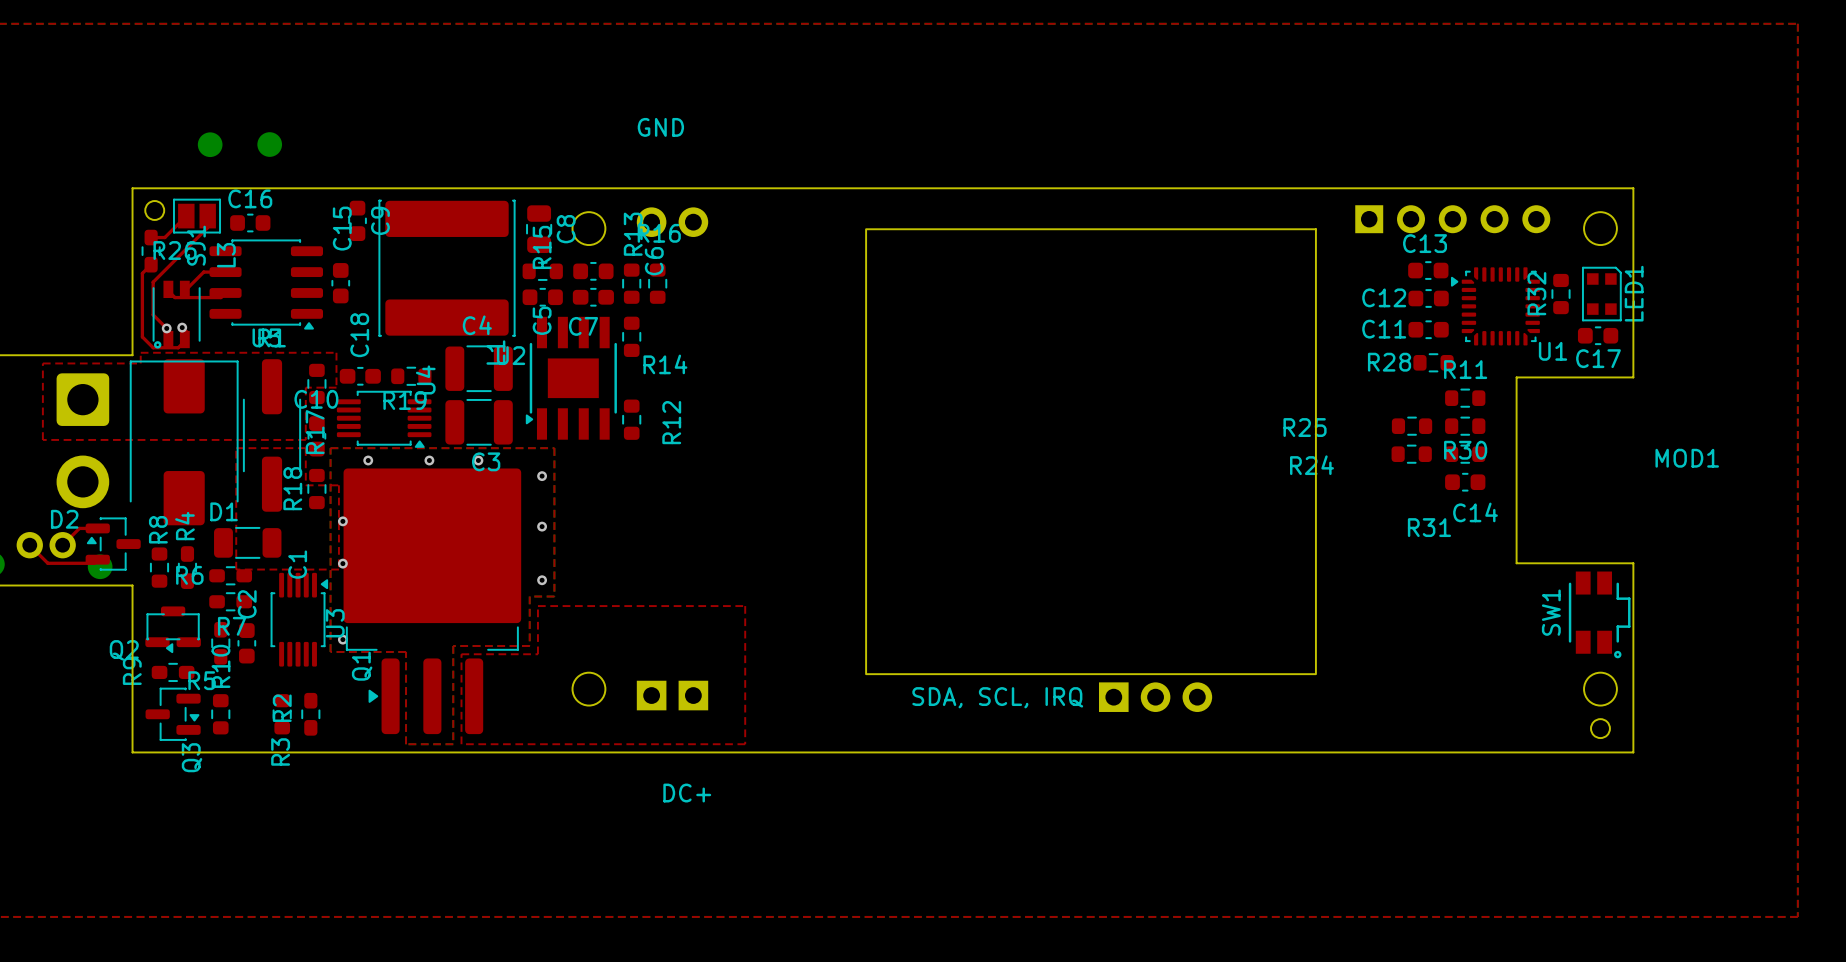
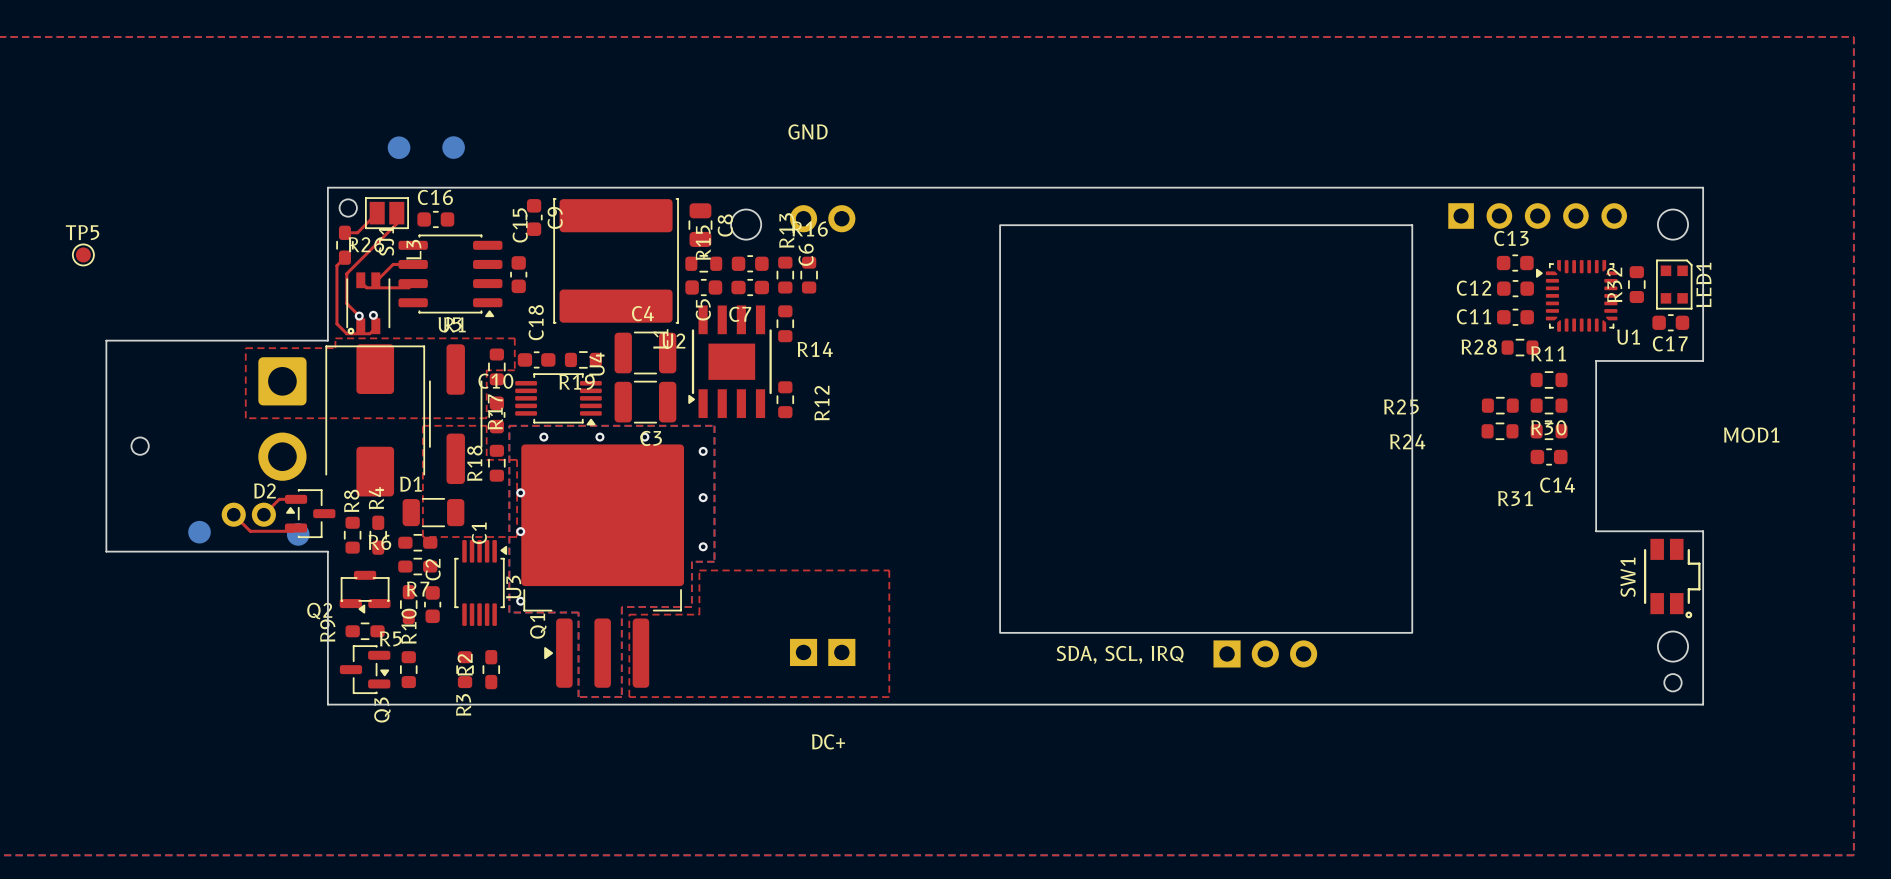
MOD1 footprint: [572, 207, 1634, 712] -> [731, 205, 1704, 668]

